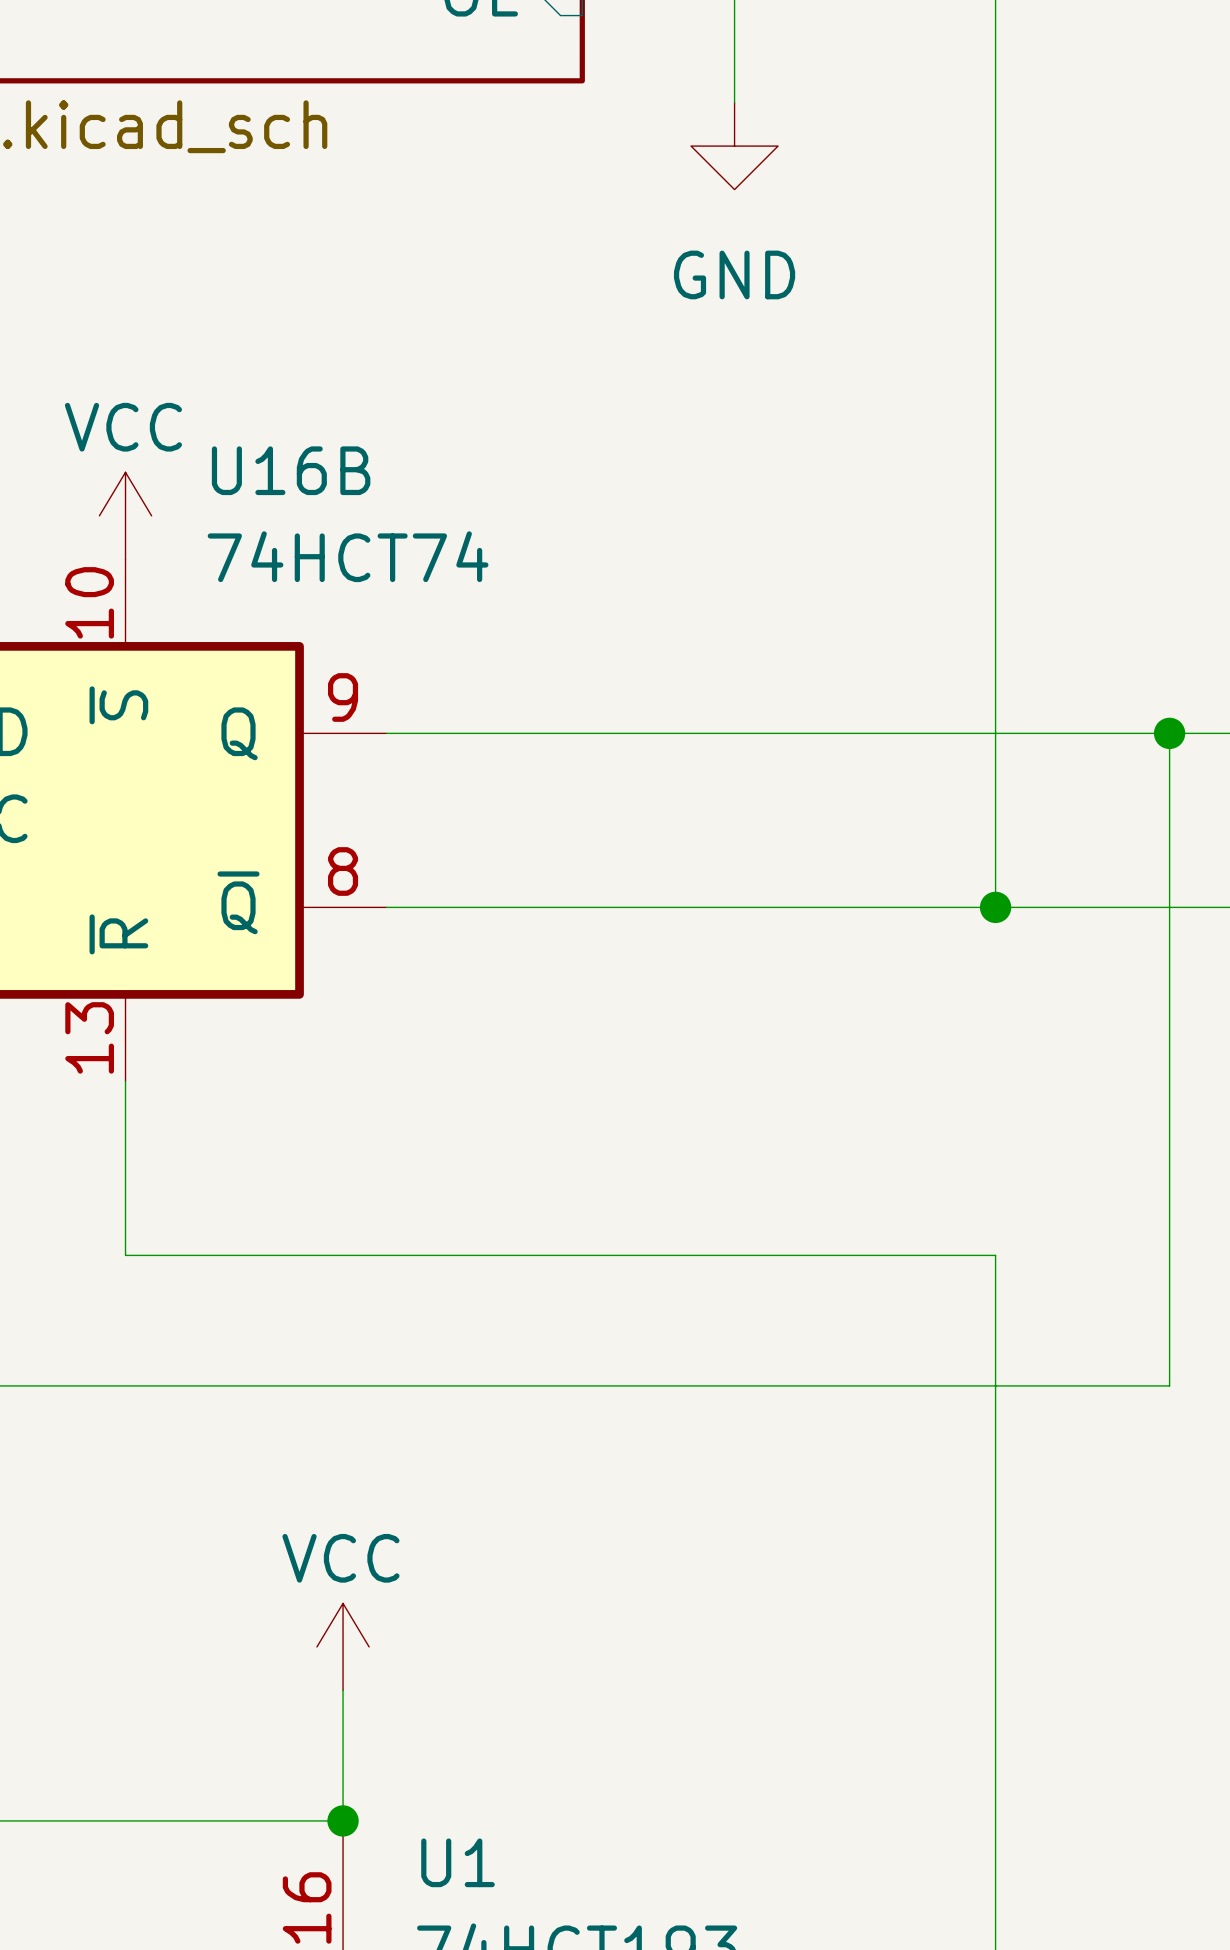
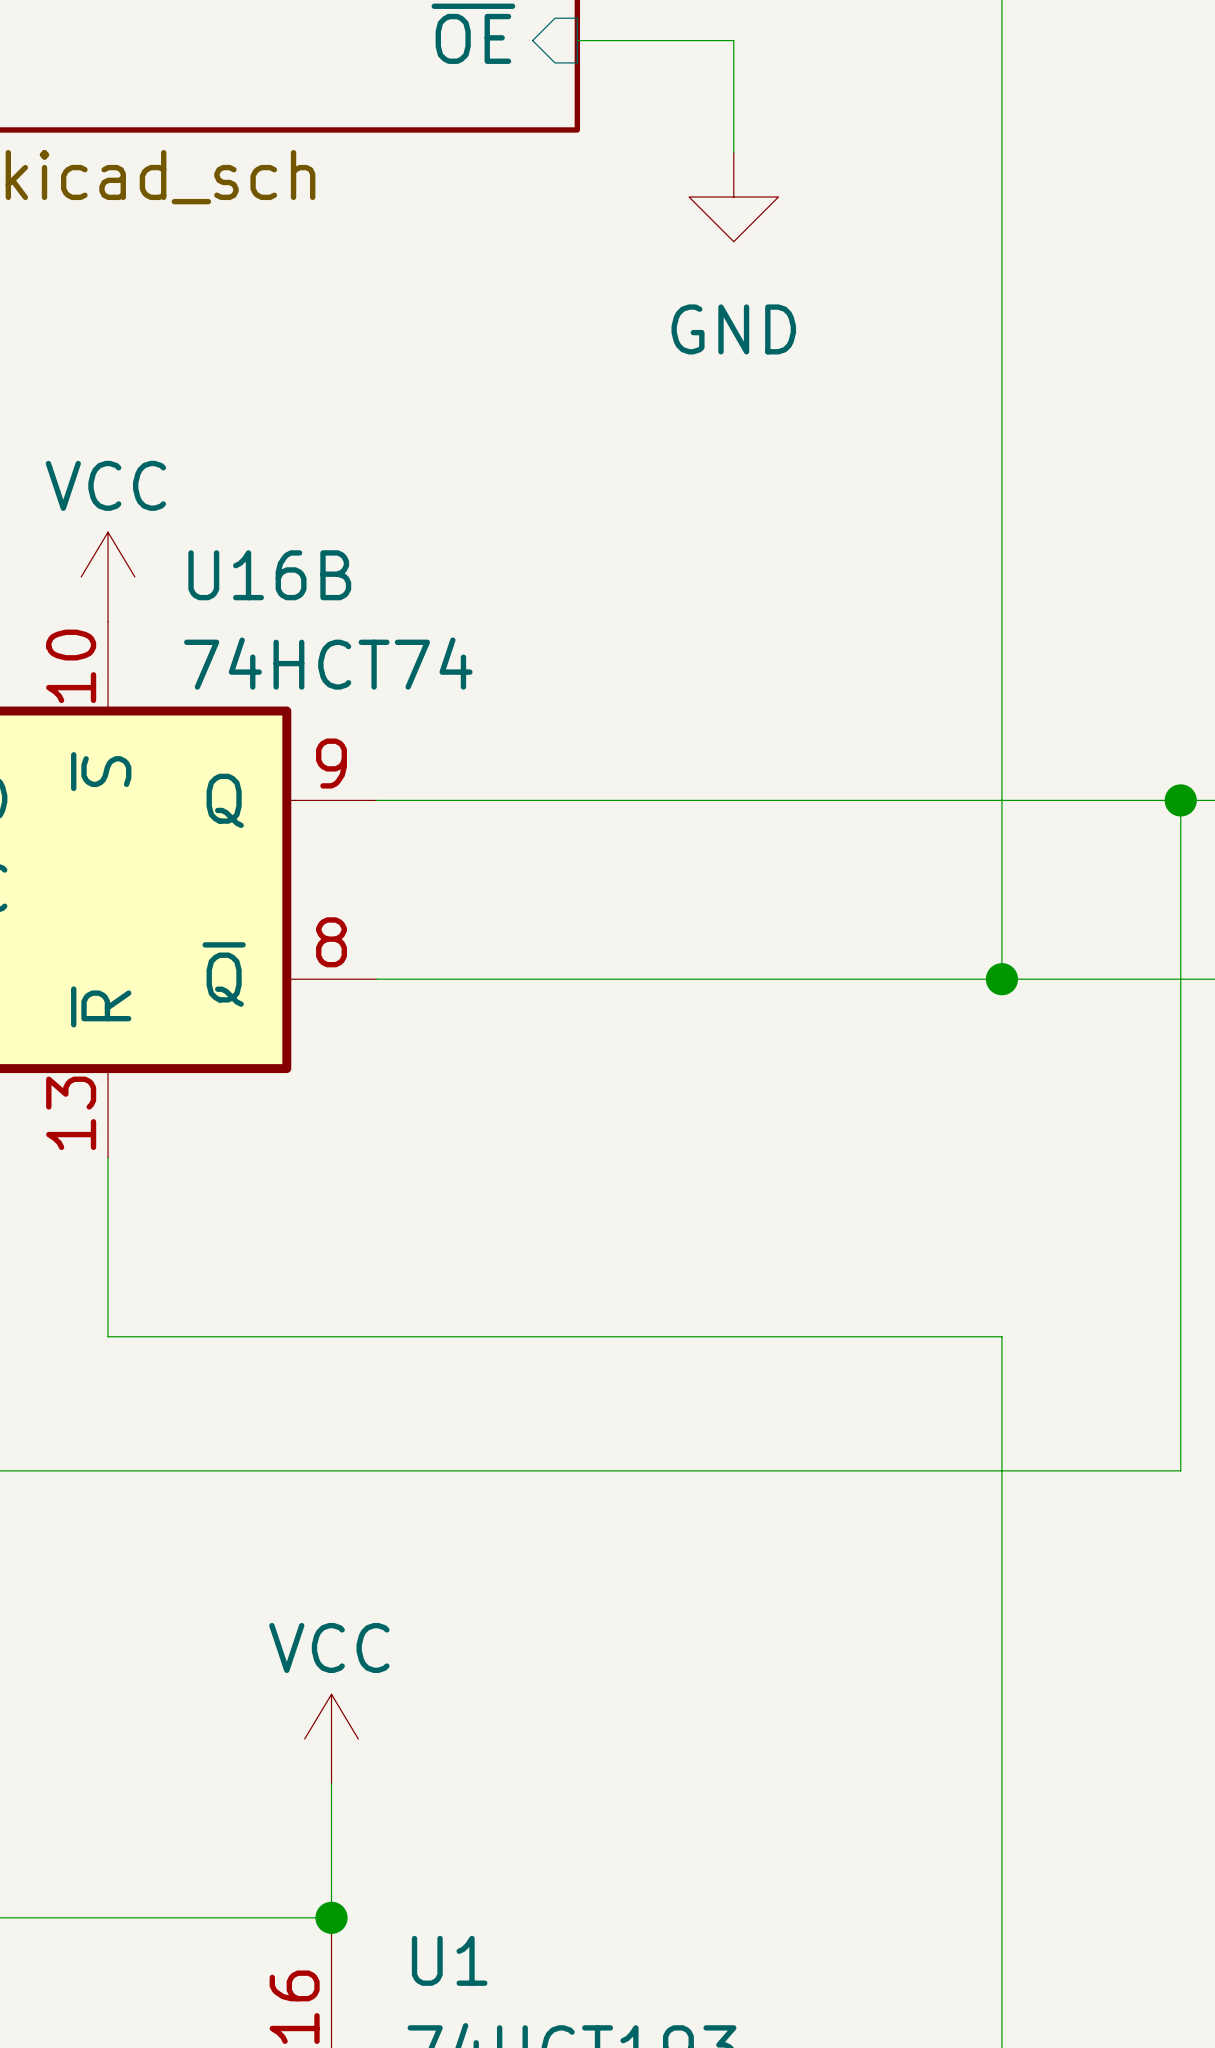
U16B name position: U16B (291, 470) -> U16B (269, 575)
U16B value position: 74HCT74 (348, 556) -> 74HCT74 (328, 663)

